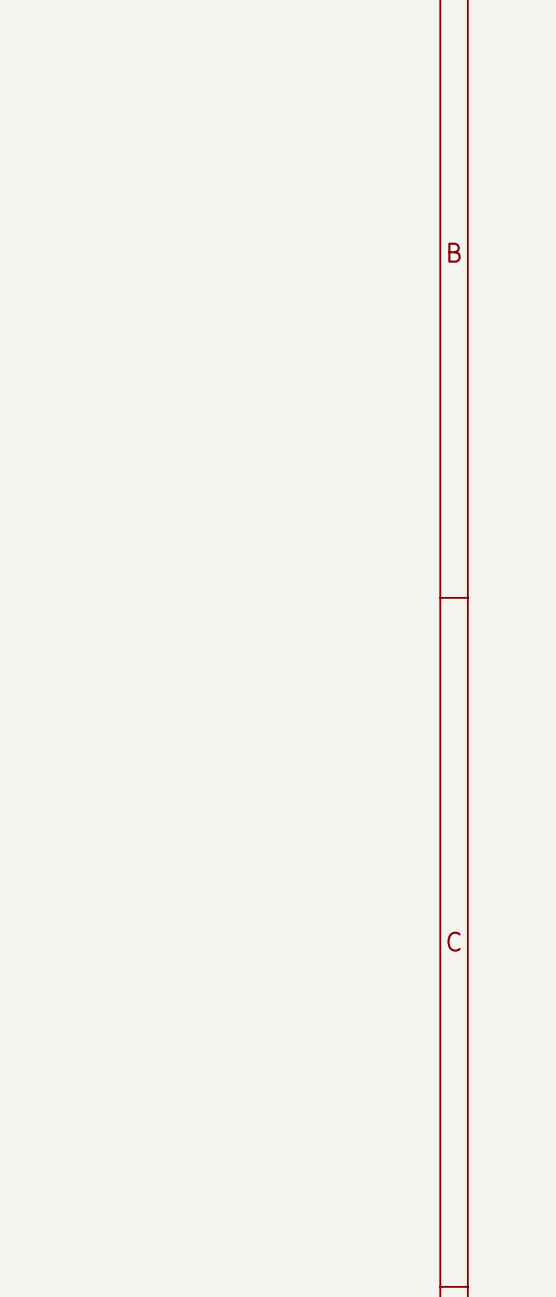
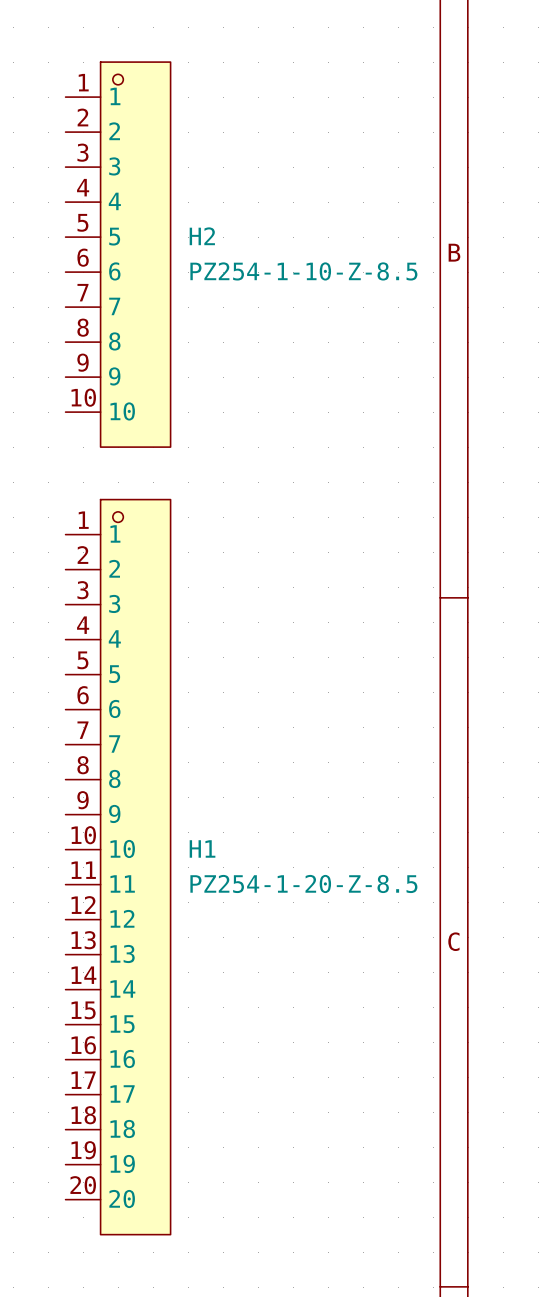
H2: none -> PZ254-1-10-Z-8.5 (118, 254)
H1: none -> PZ254-1-20-Z-8.5 (118, 867)

